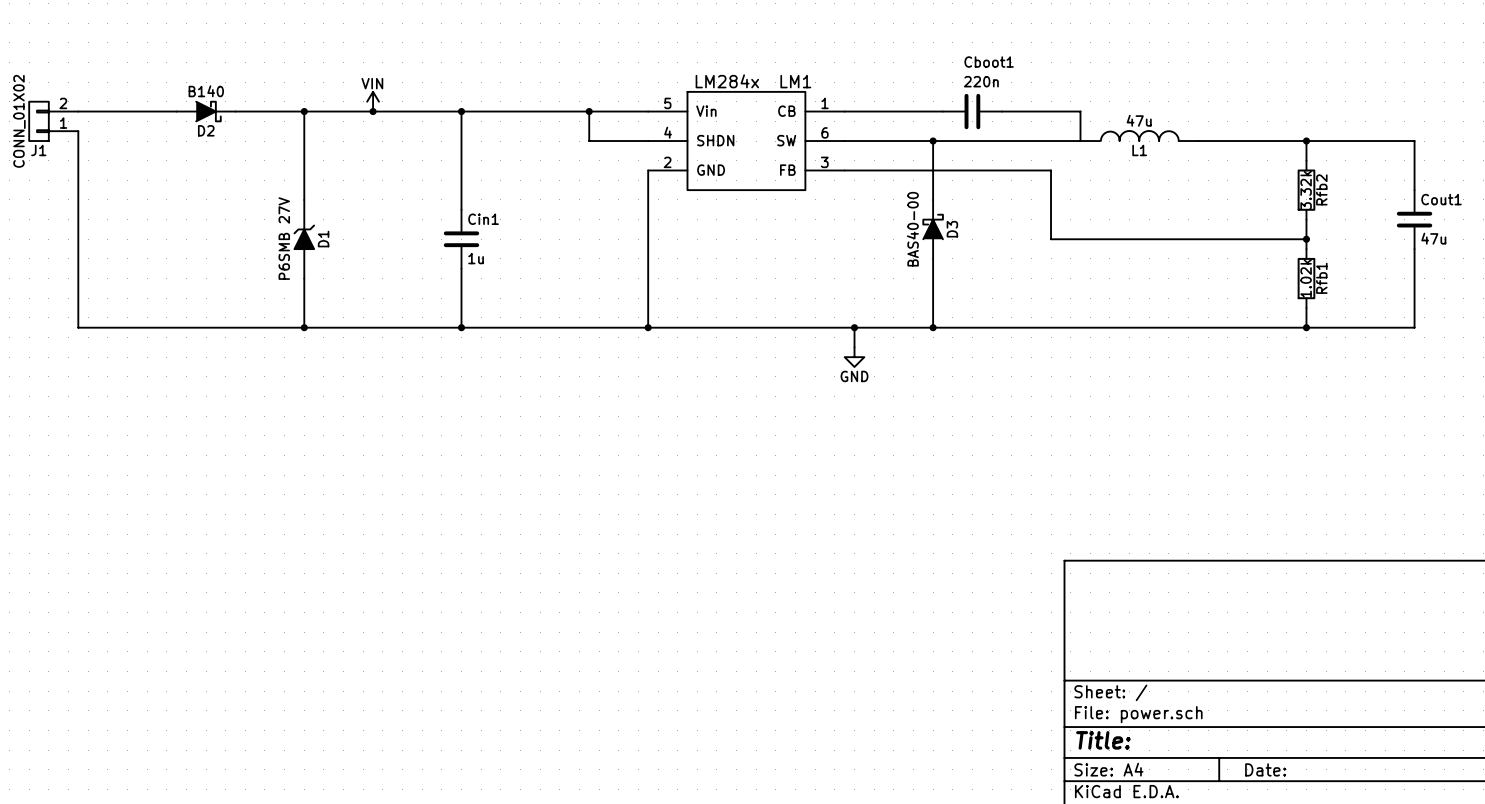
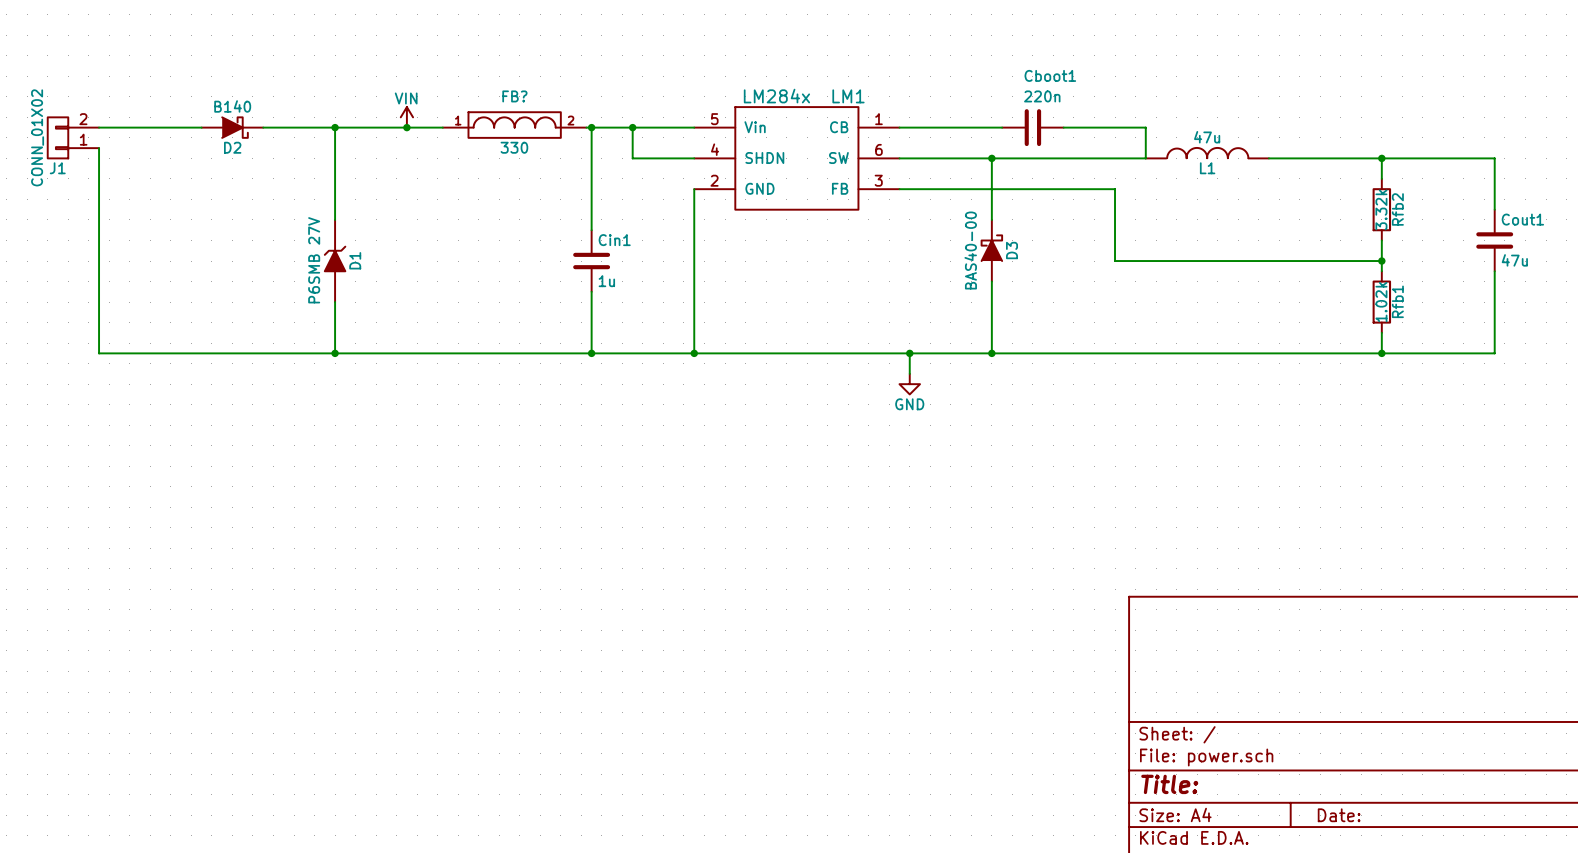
FB?: none -> 330 (514, 125)
wire: (407, 111) (545, 111) -> none
wire: (461, 111) (461, 209) -> (591, 127) (591, 230)
junction: (461, 111) -> none
junction: none -> (591, 127)
Cin1 position: (461, 239) -> (591, 261)
wire: (461, 268) (461, 327) -> (591, 291) (591, 353)
junction: (461, 327) -> none
junction: none -> (591, 353)

